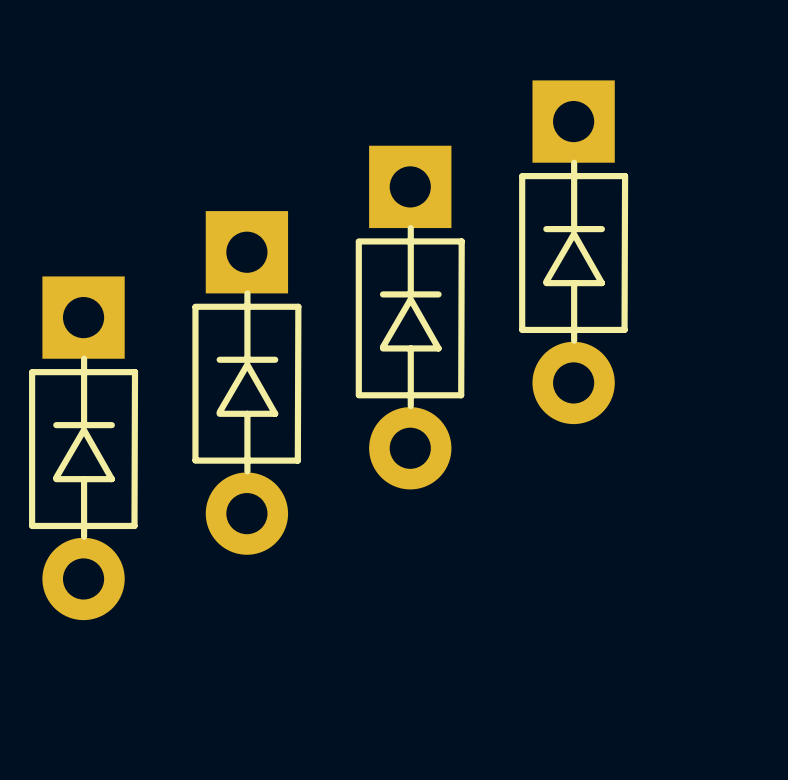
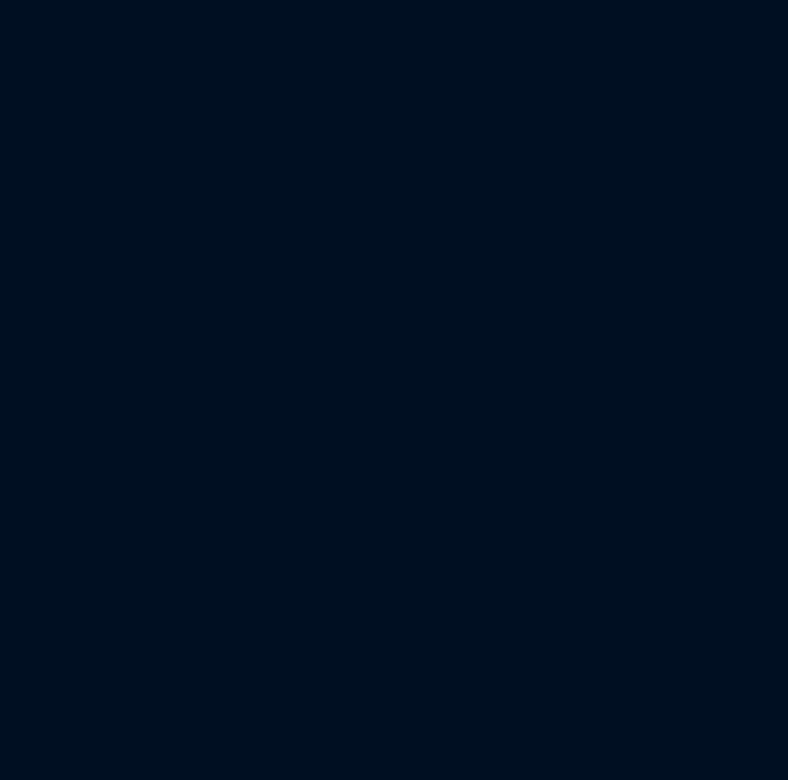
part: (573, 252) -> none
part: (410, 317) -> none
part: (246, 382) -> none
part: (83, 448) -> none

